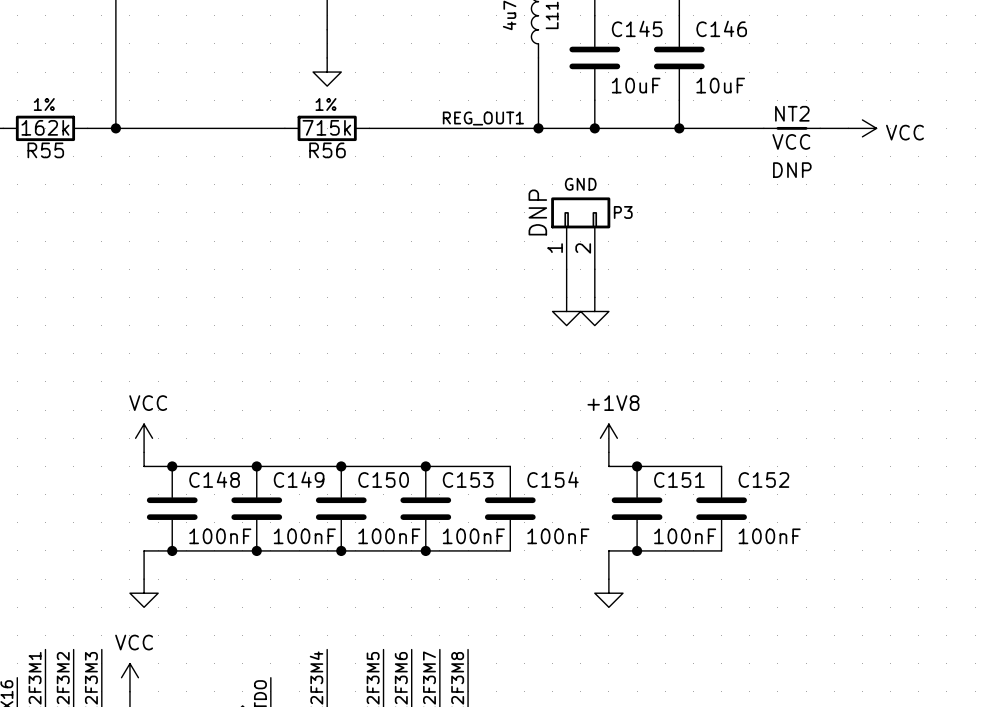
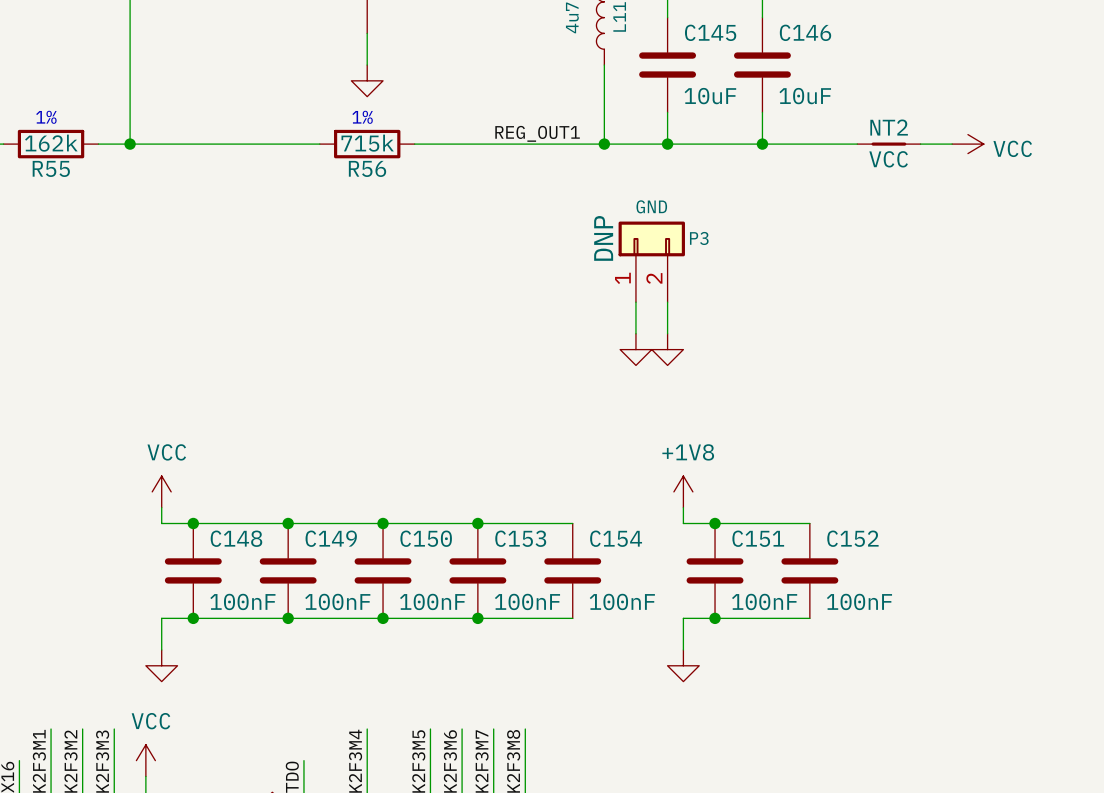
NT2 text: DNP (792, 170) -> none

